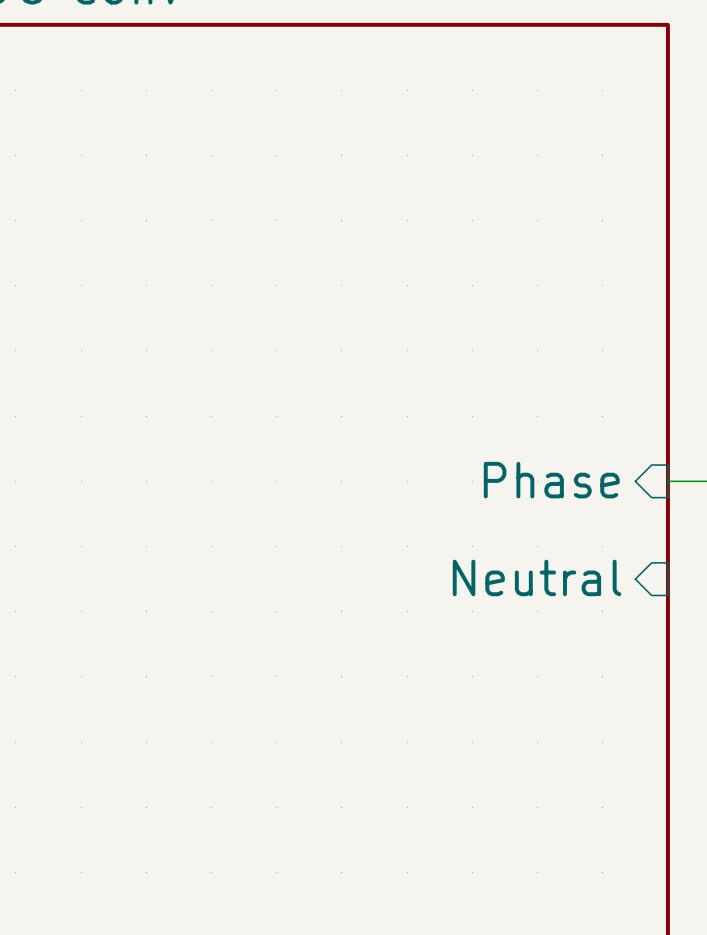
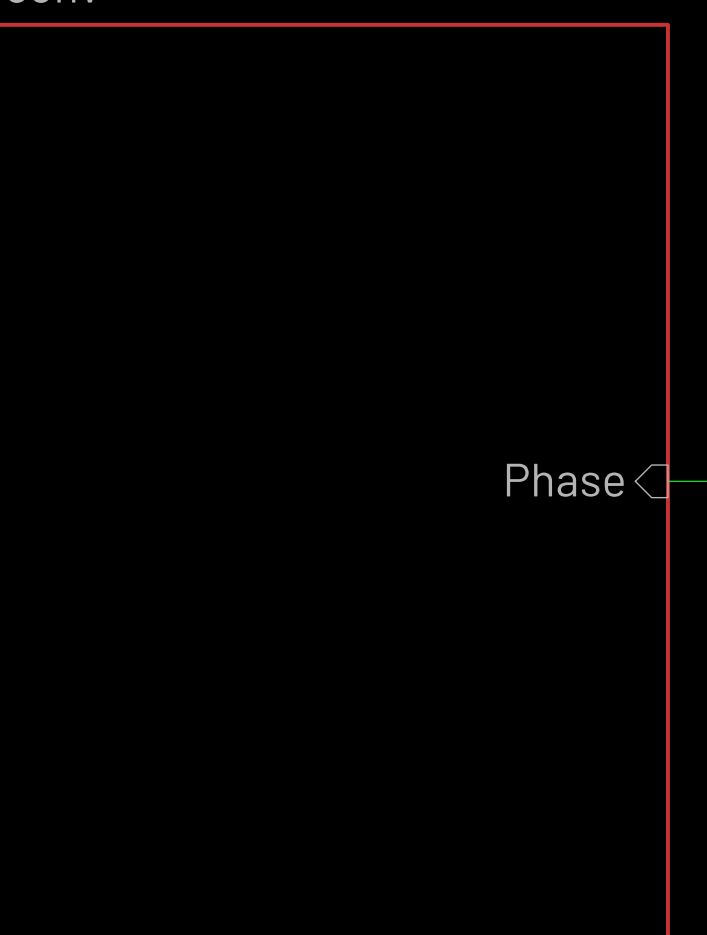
sheet pin: Neutral (537, 577) -> none

